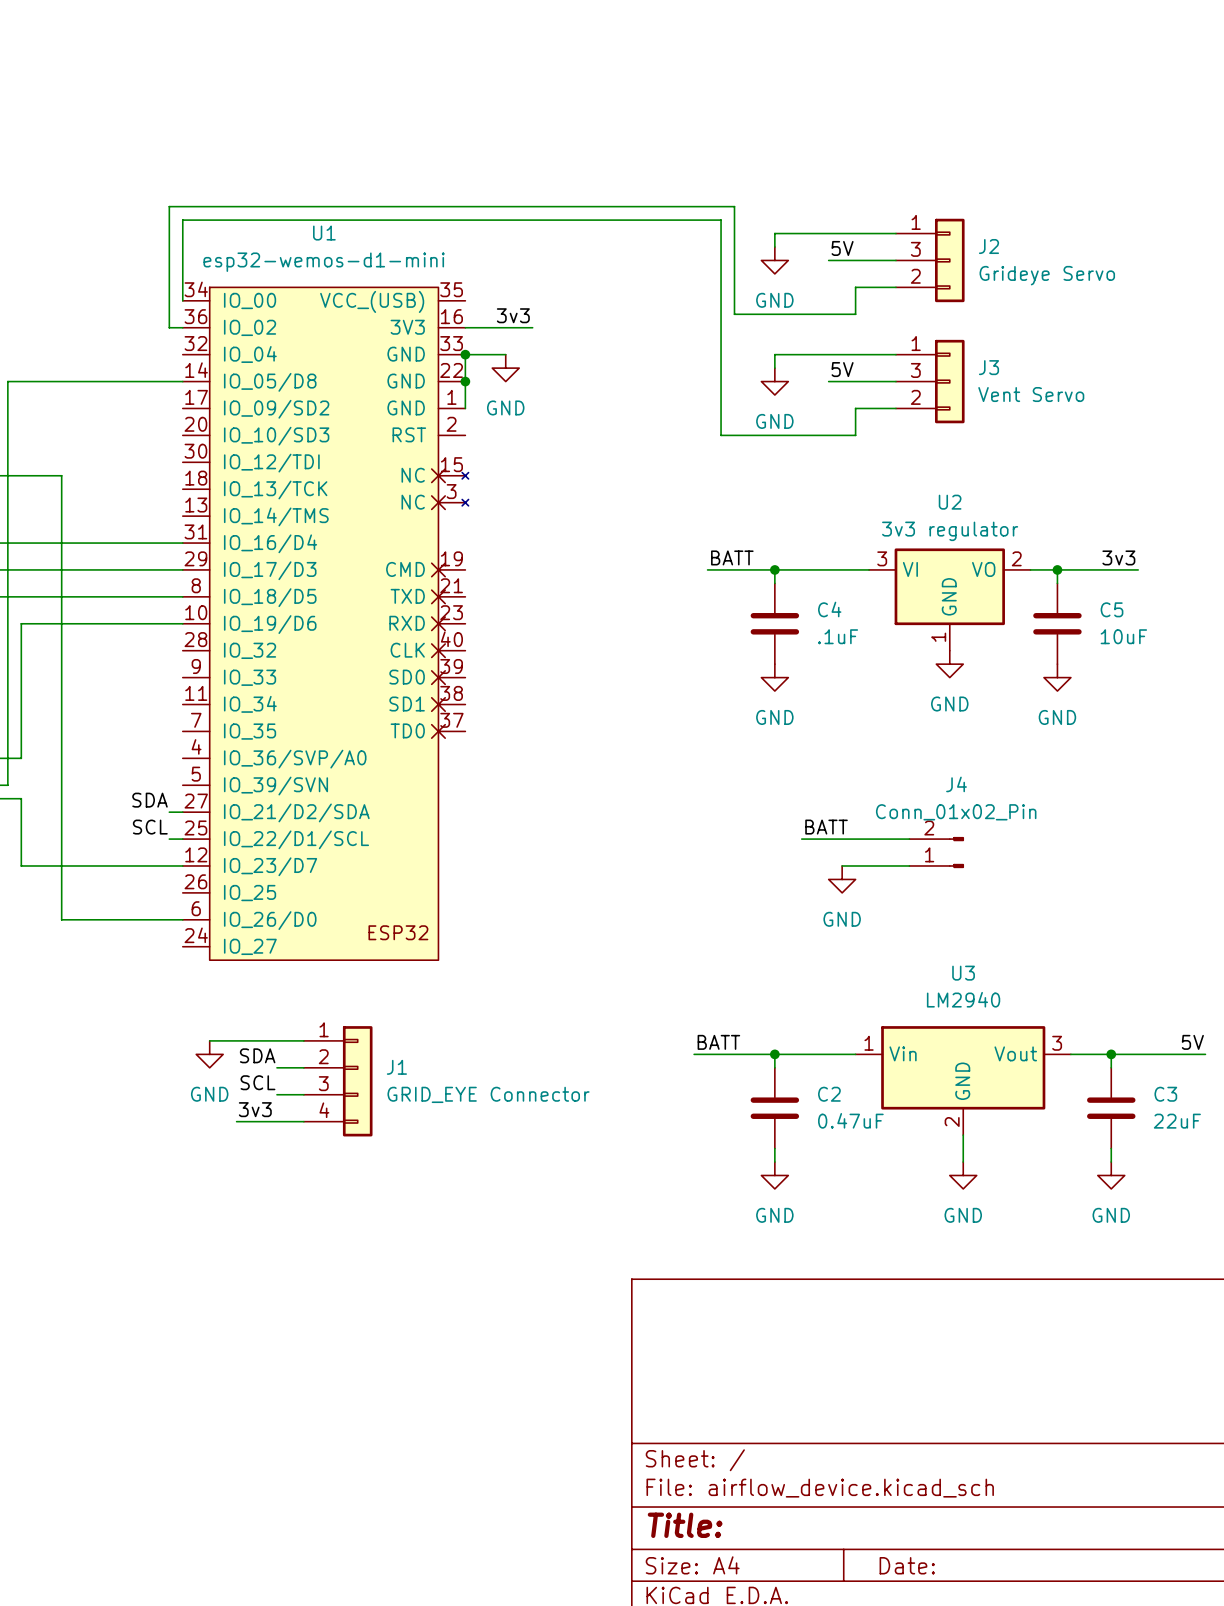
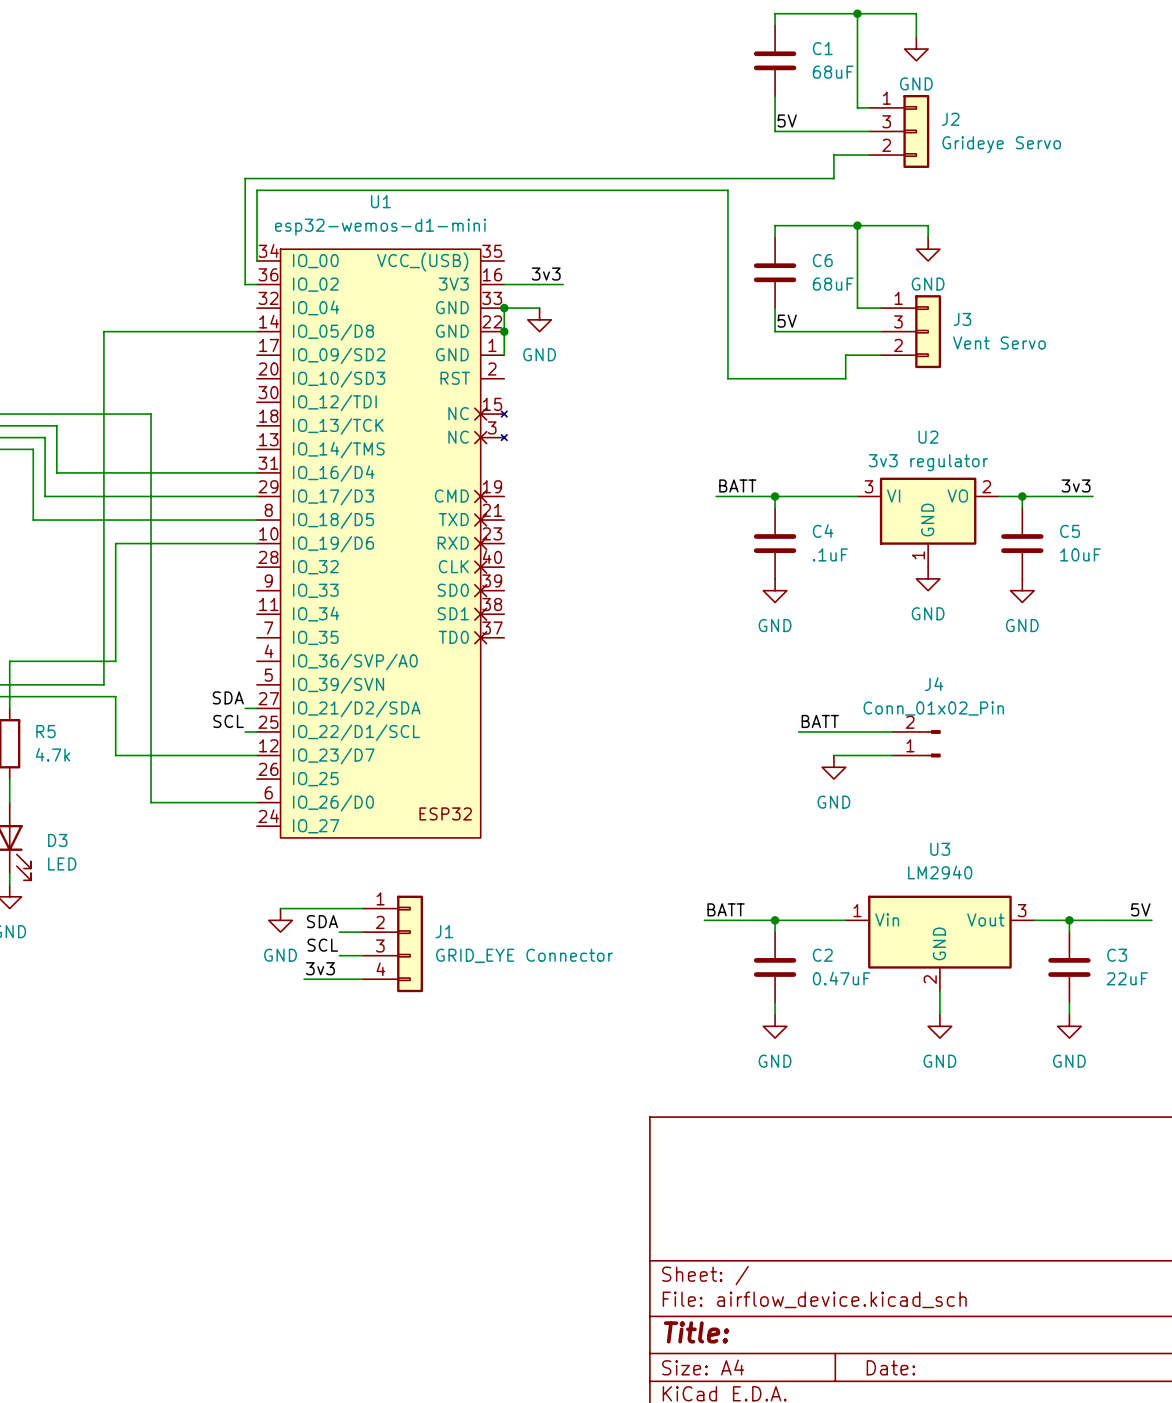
wire: none -> (857, 13) (857, 107) (869, 107)
junction: none -> (857, 13)
wire: none -> (775, 25) (775, 13) (916, 13) (916, 37)
power symbol: none -> GND (916, 49)
C1: none -> 68uF (775, 60)
wire: none -> (775, 96) (775, 131) (869, 131)
label: none -> 5V (787, 120)
wire: (734, 206) (734, 314) (855, 314) (855, 287) (895, 287) -> (739, 178) (833, 178) (833, 155) (869, 155)
wire: (895, 233) (774, 233) (774, 247) -> none
label: 5V (842, 248) -> none
power symbol: GND (774, 260) -> none
wire: none -> (822, 225) (775, 225) (775, 237)
junction: none -> (857, 225)
J2 position: (930, 260) -> (899, 131)
power symbol: none -> GND (928, 249)
C6: none -> 68uF (775, 272)
wire: (774, 354) (869, 354) -> (857, 225) (857, 308)
wire: none -> (775, 319) (775, 331) (822, 331)
label position: 5V (842, 369) -> 5V (787, 321)
power symbol: GND (774, 381) -> none

